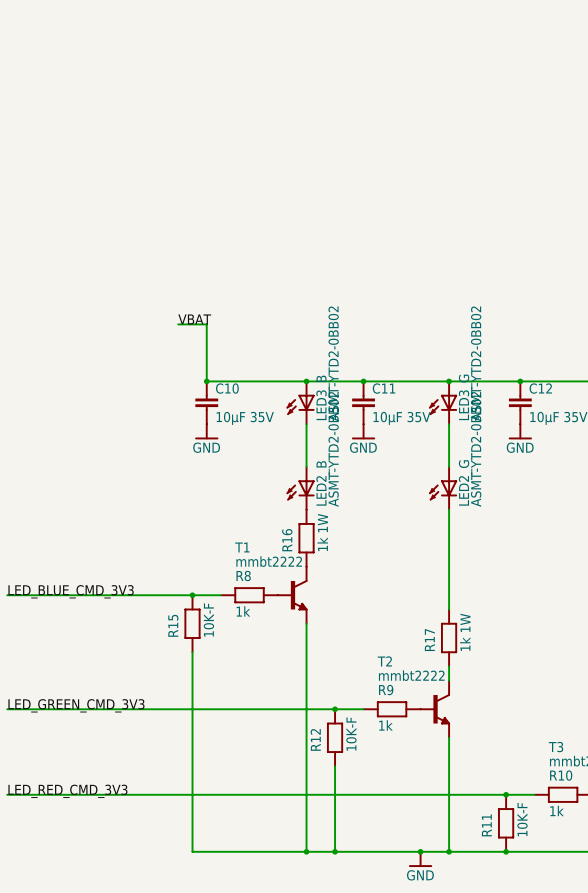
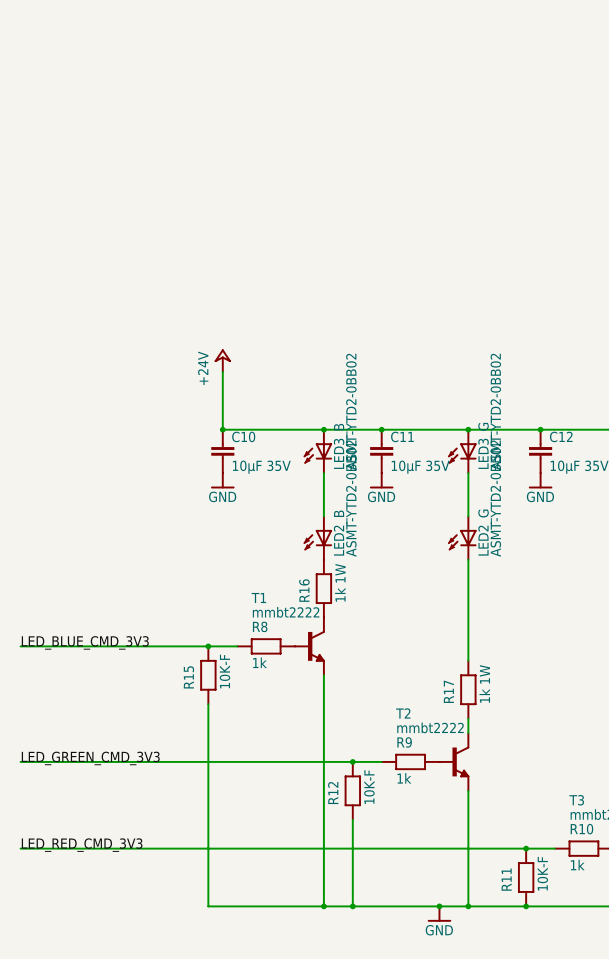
power symbol: none -> +24V (222, 360)
label: VBAT (194, 319) -> none
wire: (178, 324) (206, 324) -> none

